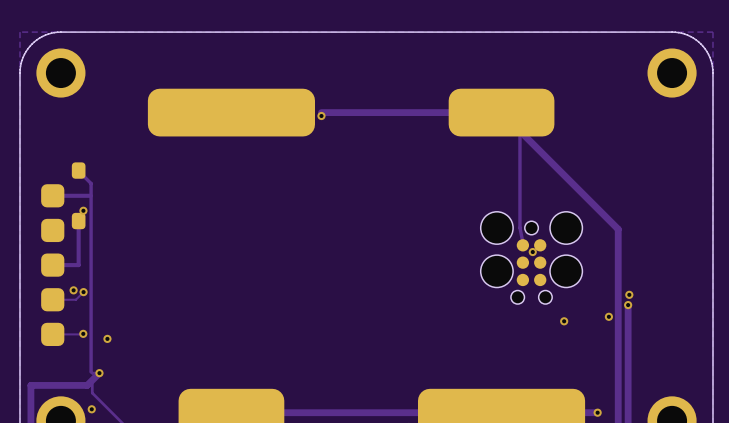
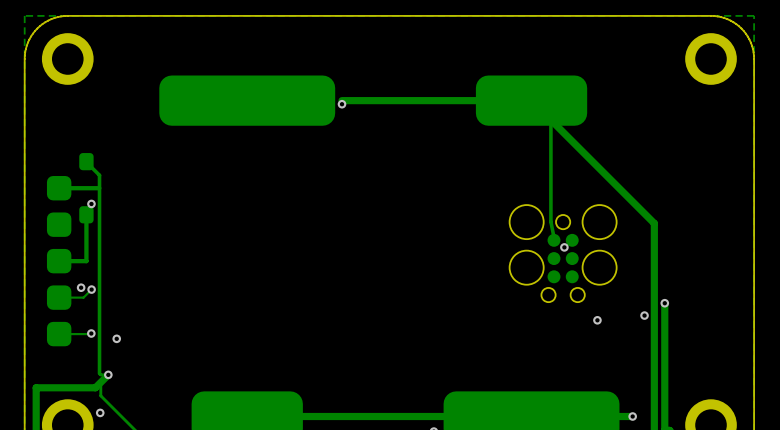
via: (629, 294) -> none

